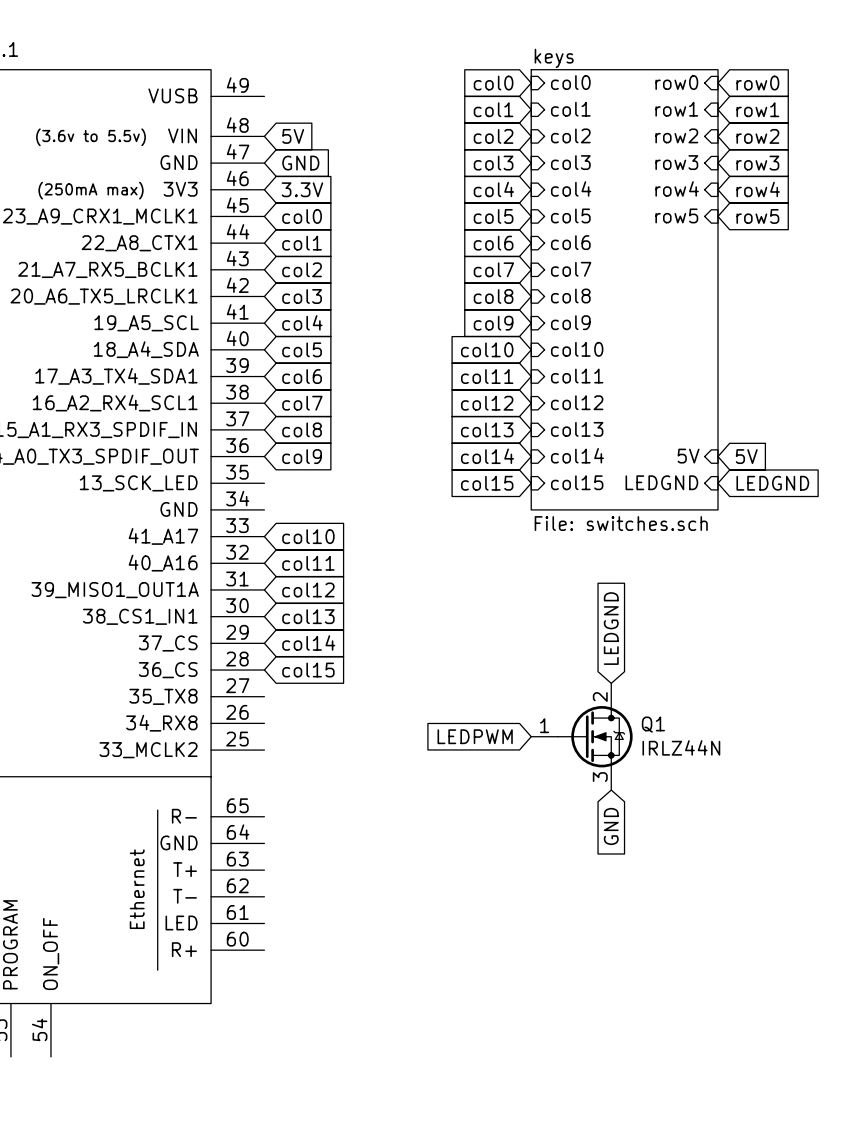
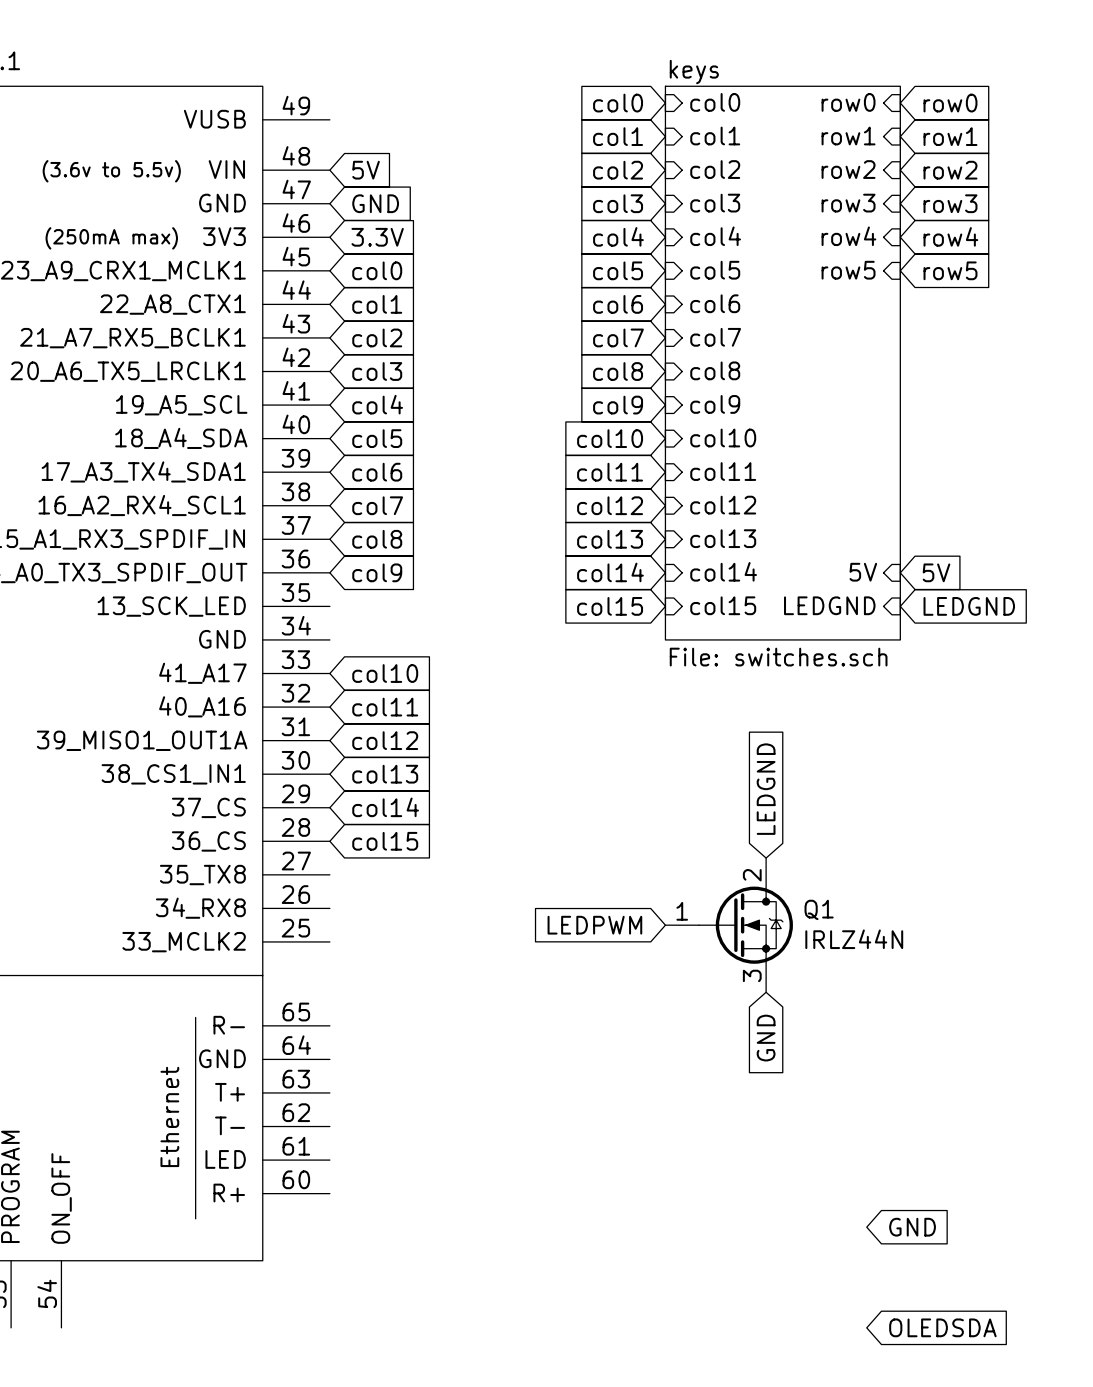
global label: none -> GND (912, 1227)
global label: none -> OLEDSDA (942, 1327)

